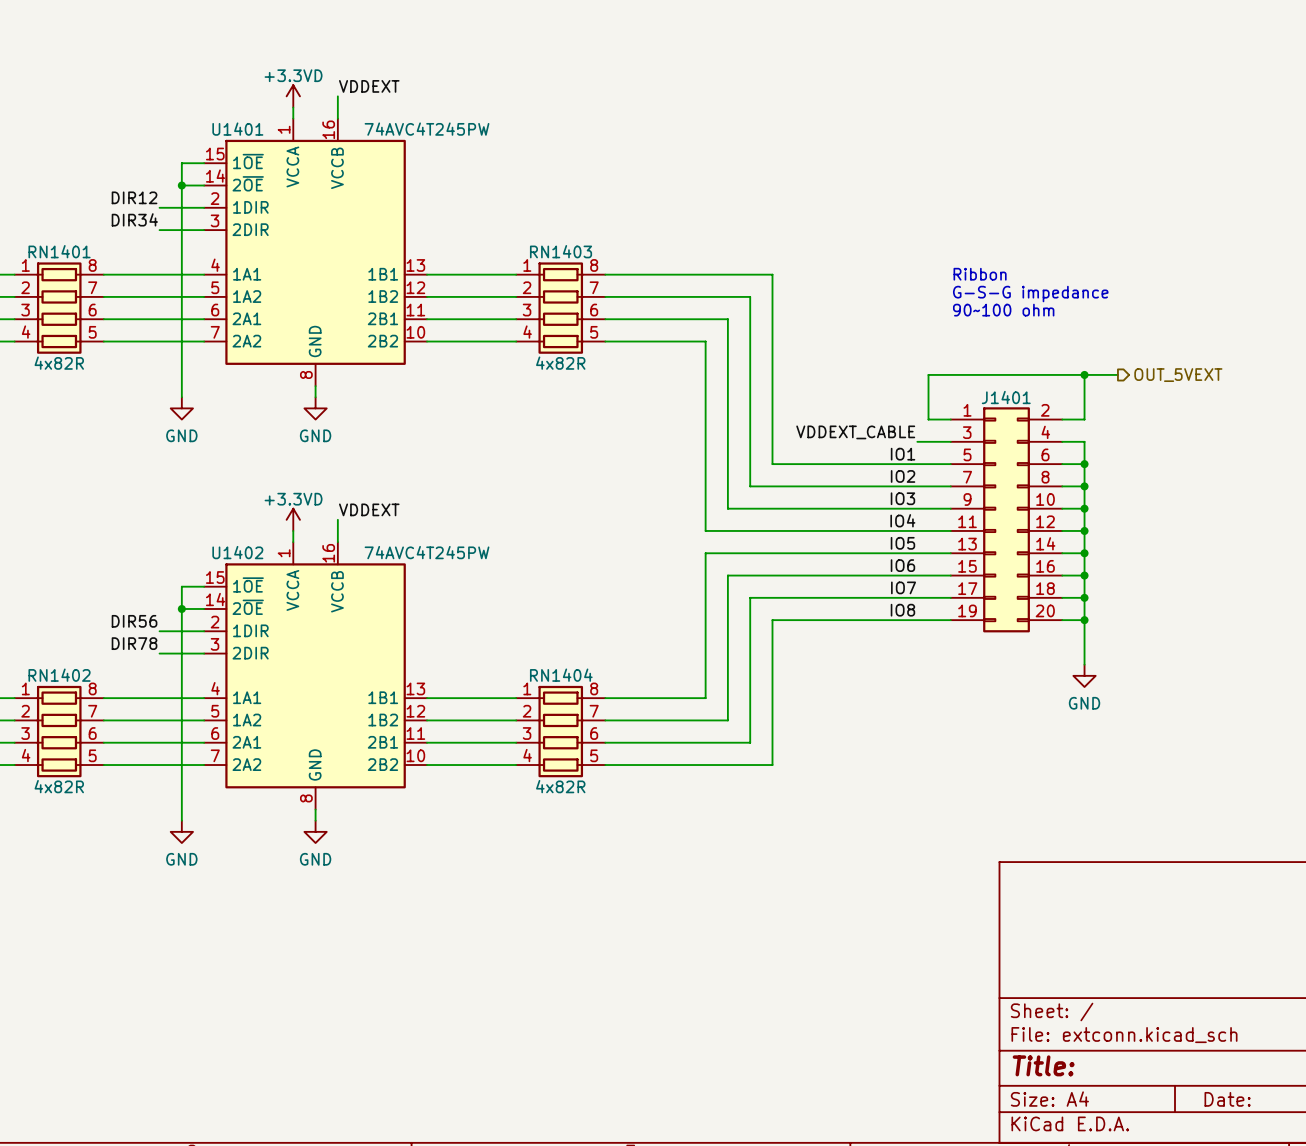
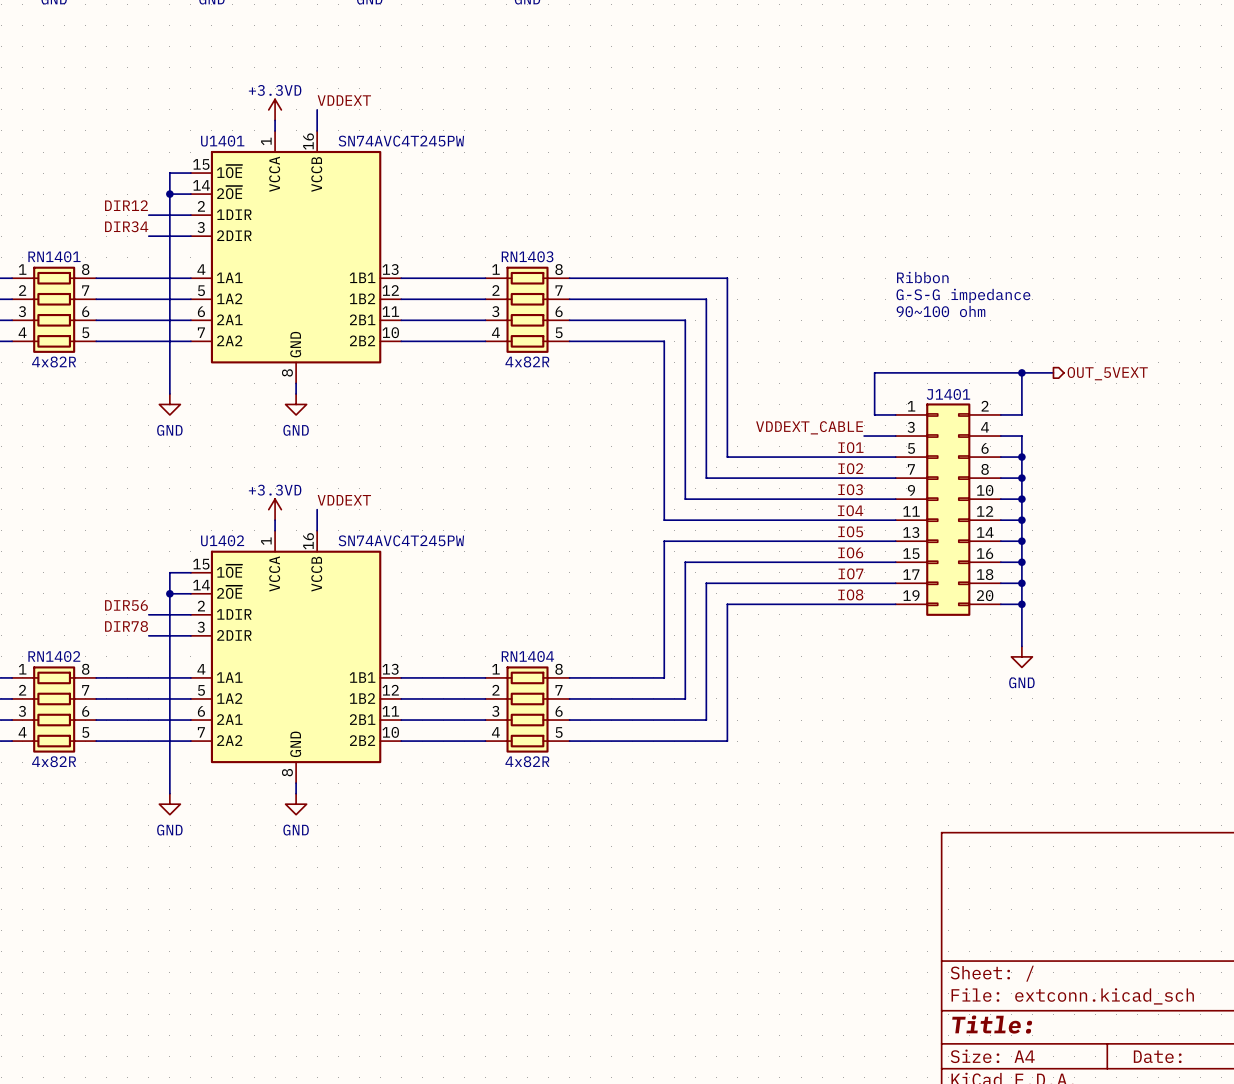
U1401 value: 74AVC4T245PW (427, 129) -> SN74AVC4T245PW (401, 141)
U1402 value: 74AVC4T245PW (427, 552) -> SN74AVC4T245PW (401, 540)

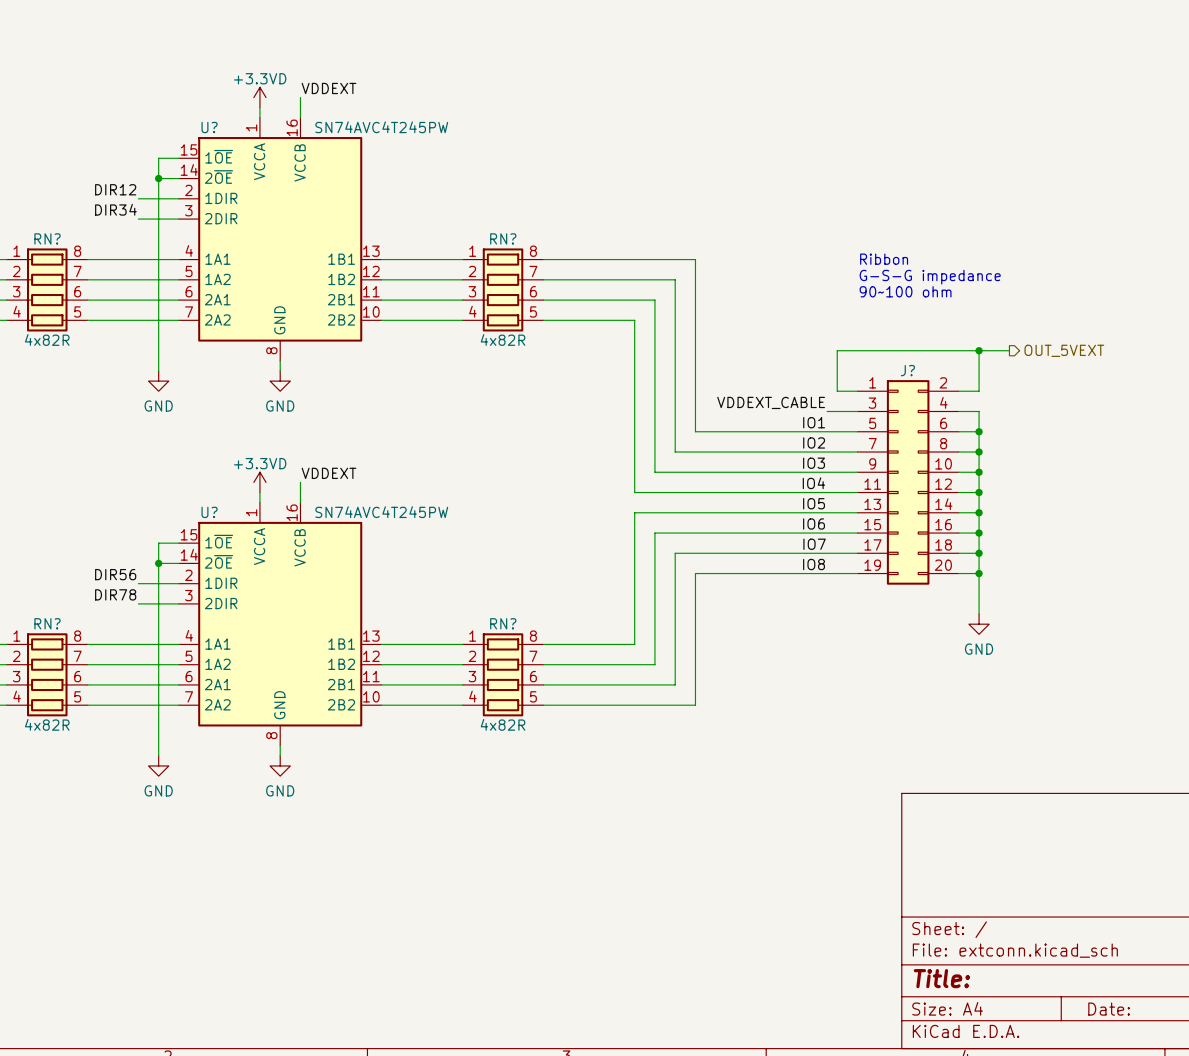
U1401 name: U1401 (222, 141) -> U? (209, 127)
RN1401 name: RN1401 (54, 256) -> RN? (47, 238)
RN1403 name: RN1403 (527, 256) -> RN? (503, 238)
J1401 name: J1401 (948, 394) -> J? (907, 370)
U1402 name: U1402 (222, 540) -> U? (209, 512)
RN1402 name: RN1402 (54, 656) -> RN? (47, 623)
RN1404 name: RN1404 (527, 656) -> RN? (503, 623)

